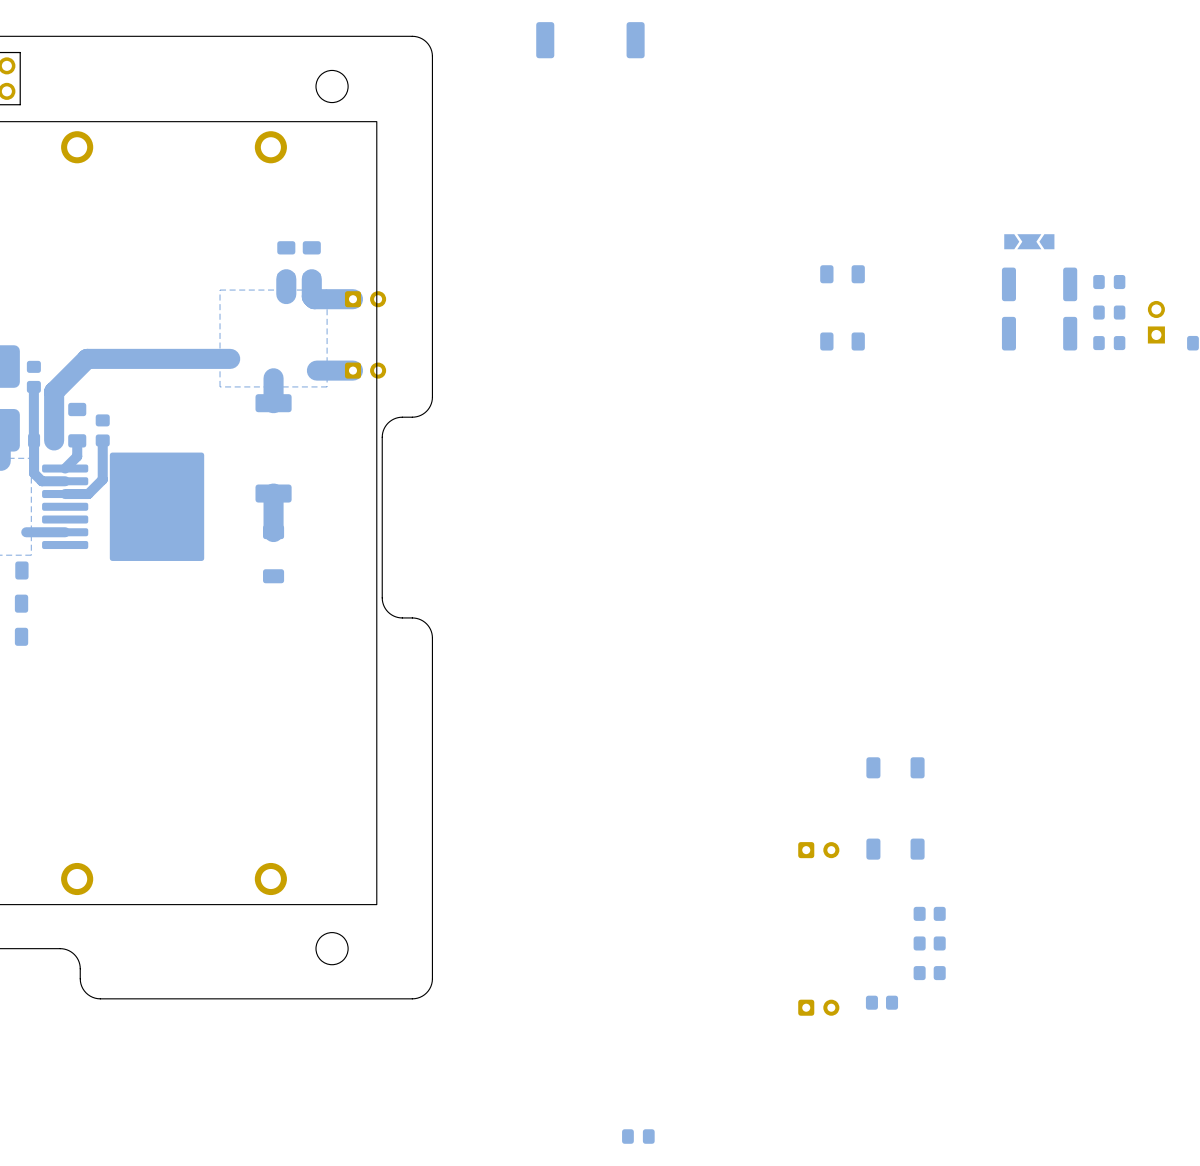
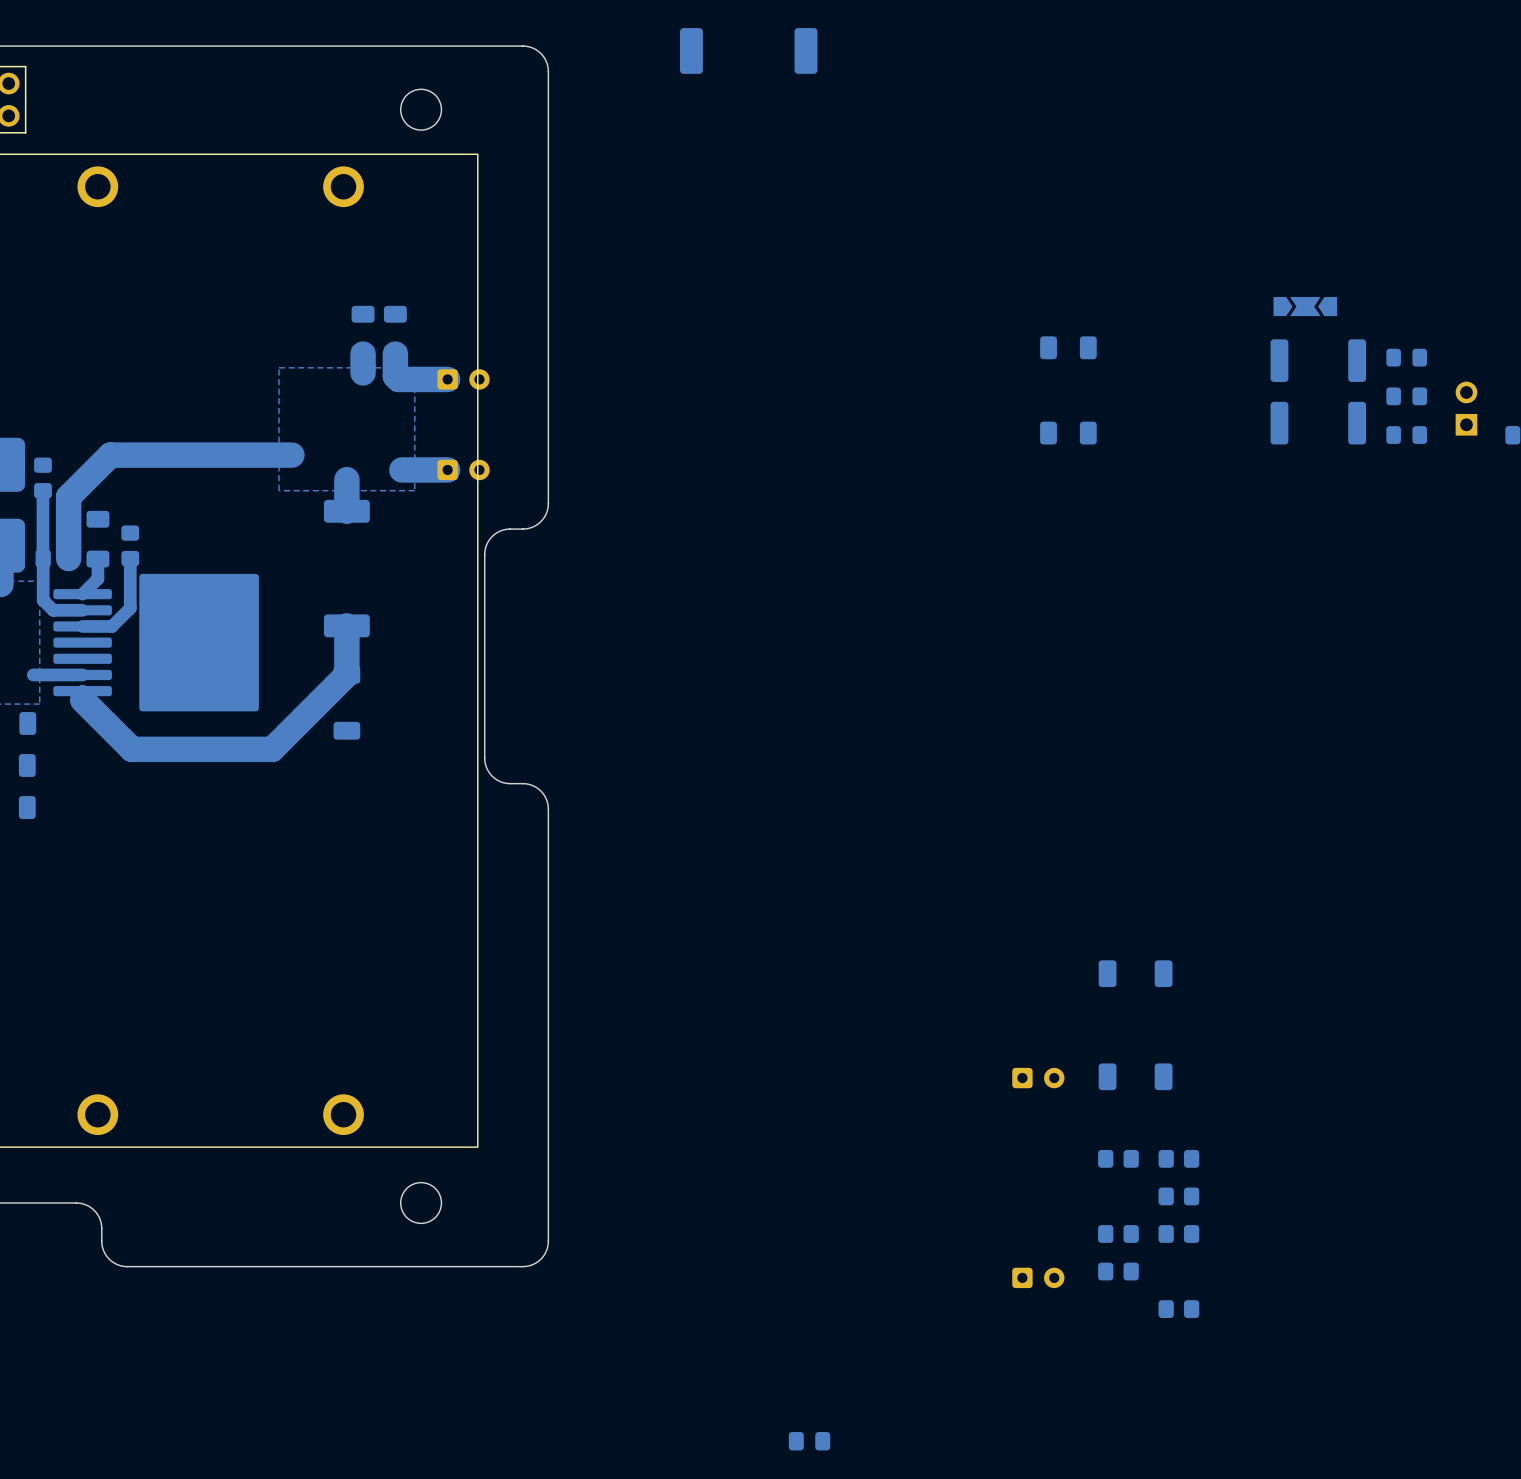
bottom track: none -> (346, 674) (272, 749) (131, 749) (82, 699) (82, 691)
part: none -> (1118, 1158)
part: none -> (1118, 1233)
part: none -> (1178, 1309)

